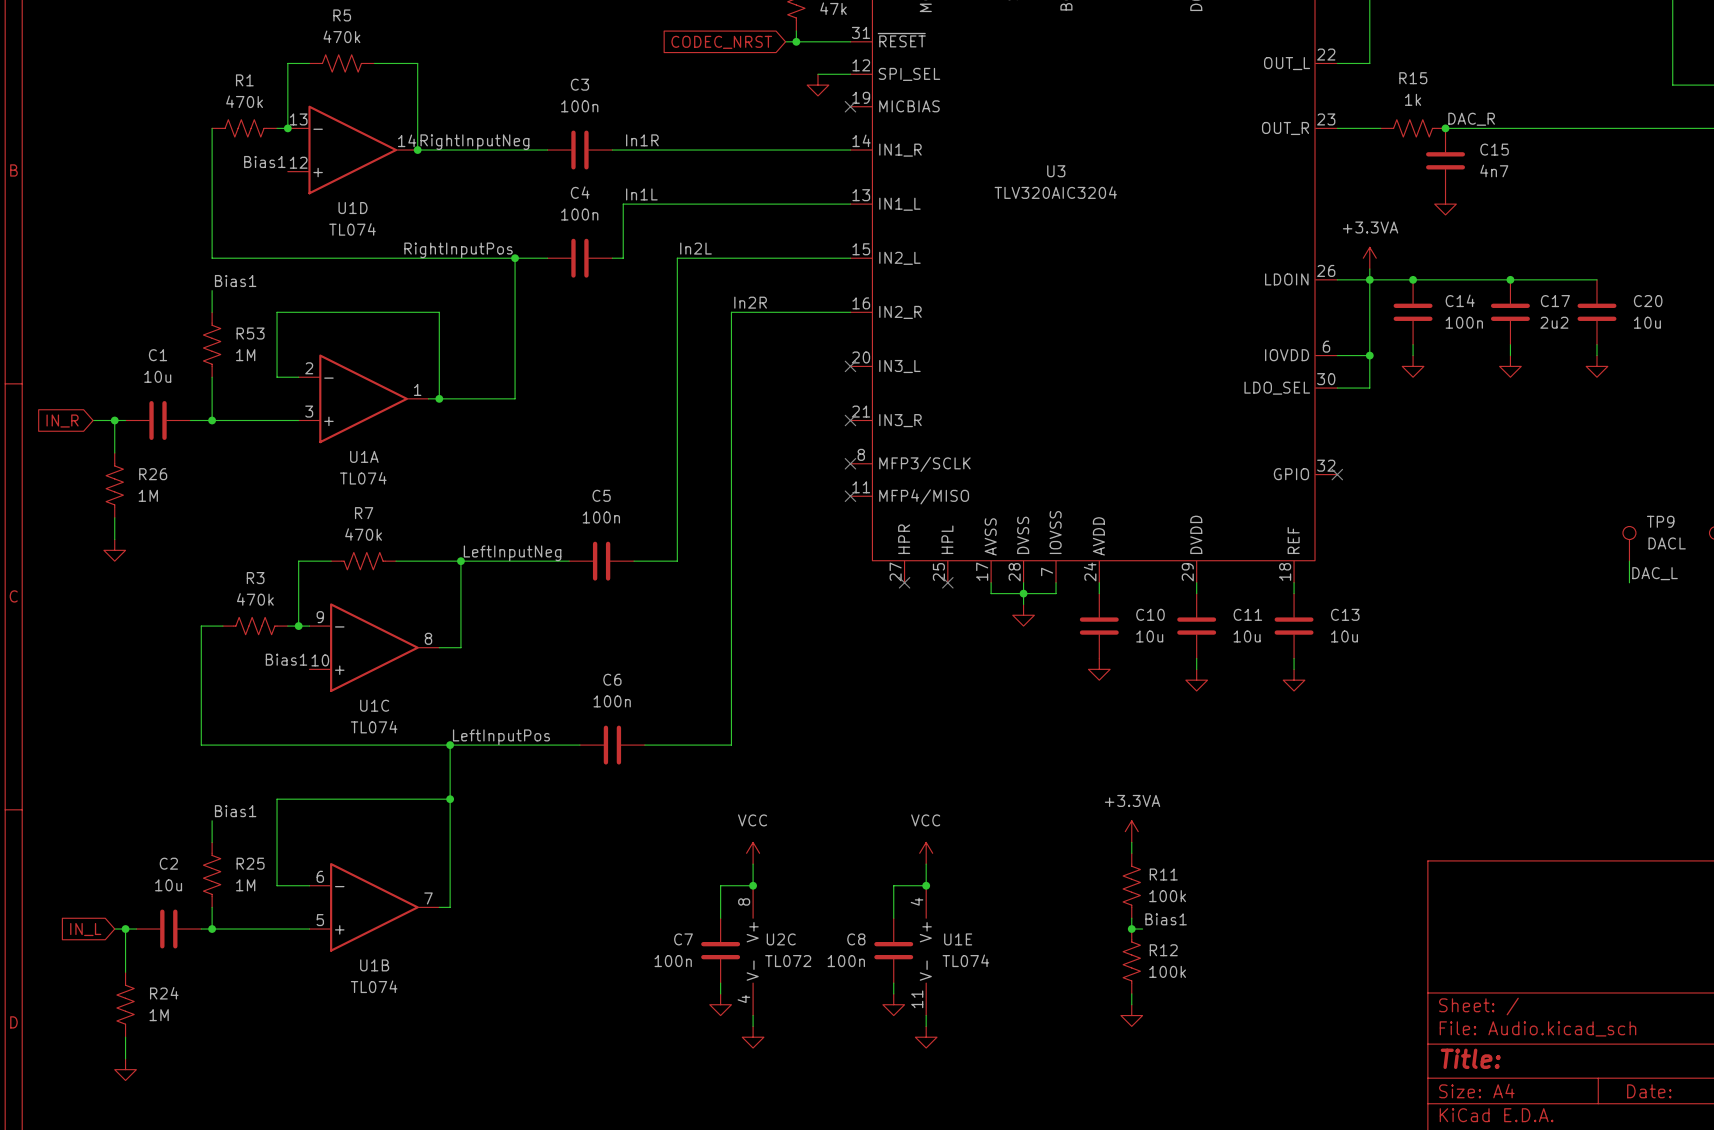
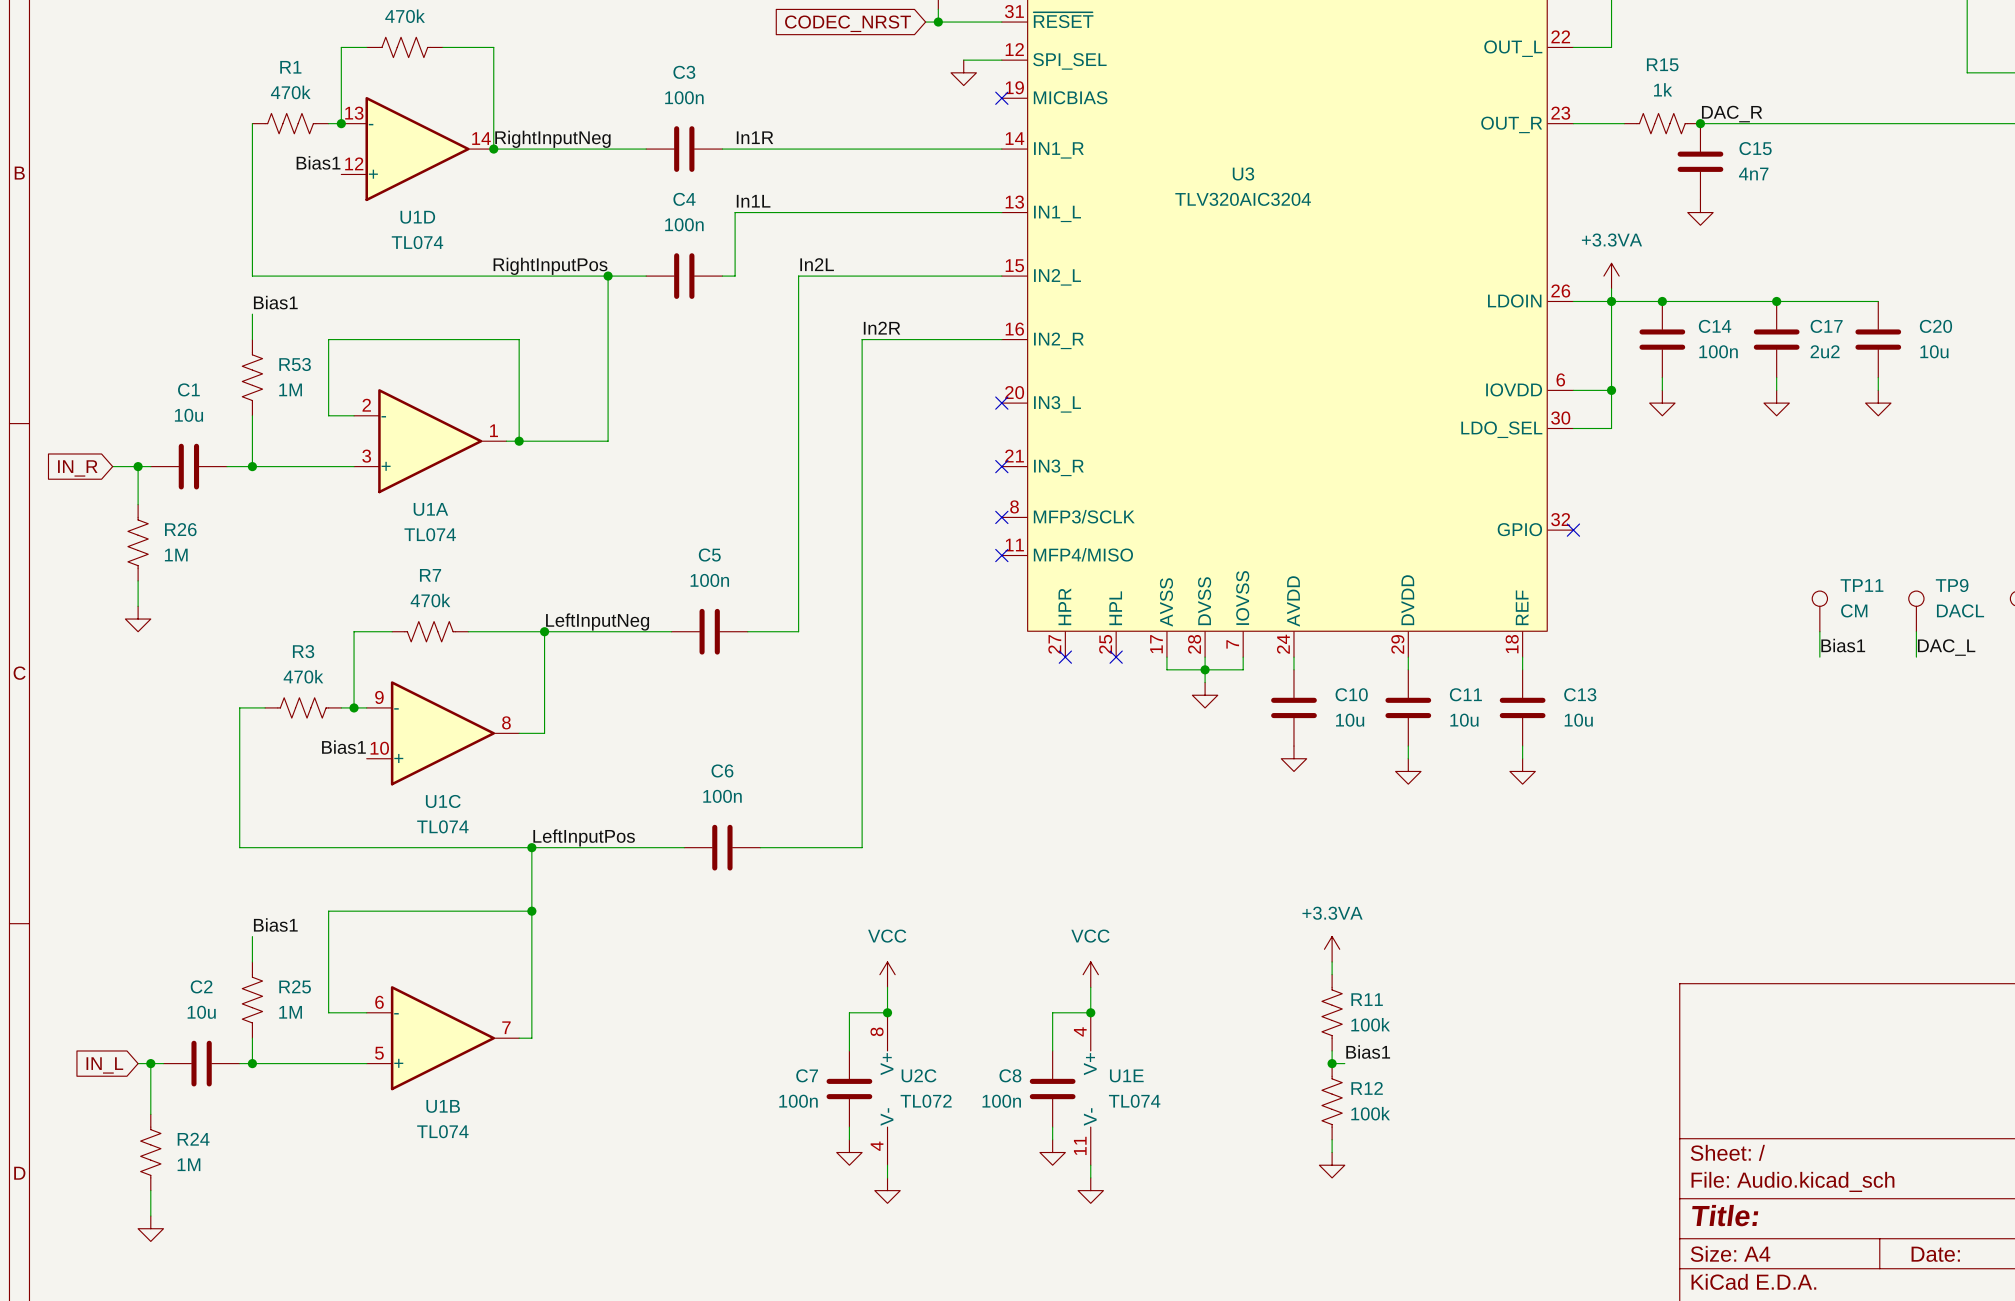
TP11: none -> CM (1819, 611)
wire: none -> (1819, 631) (1819, 657)
label: none -> Bias1 (1843, 645)

